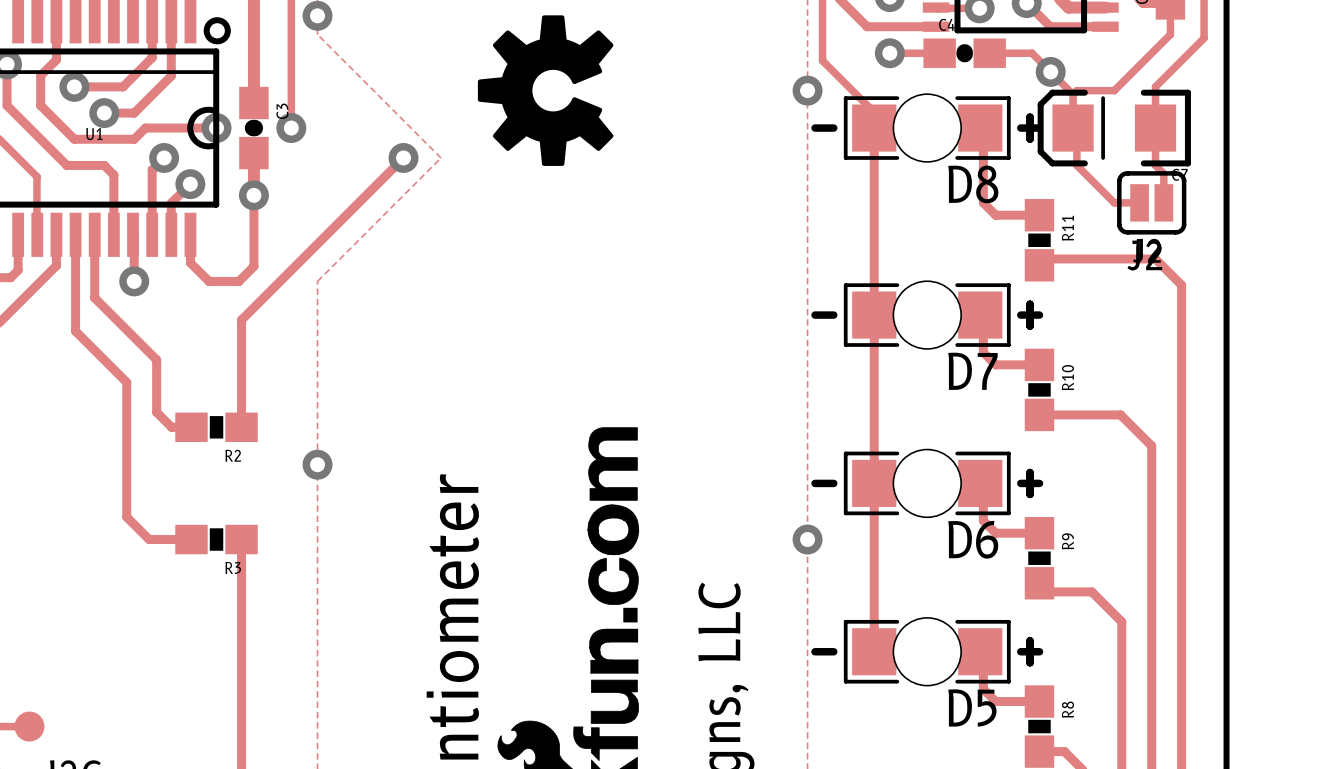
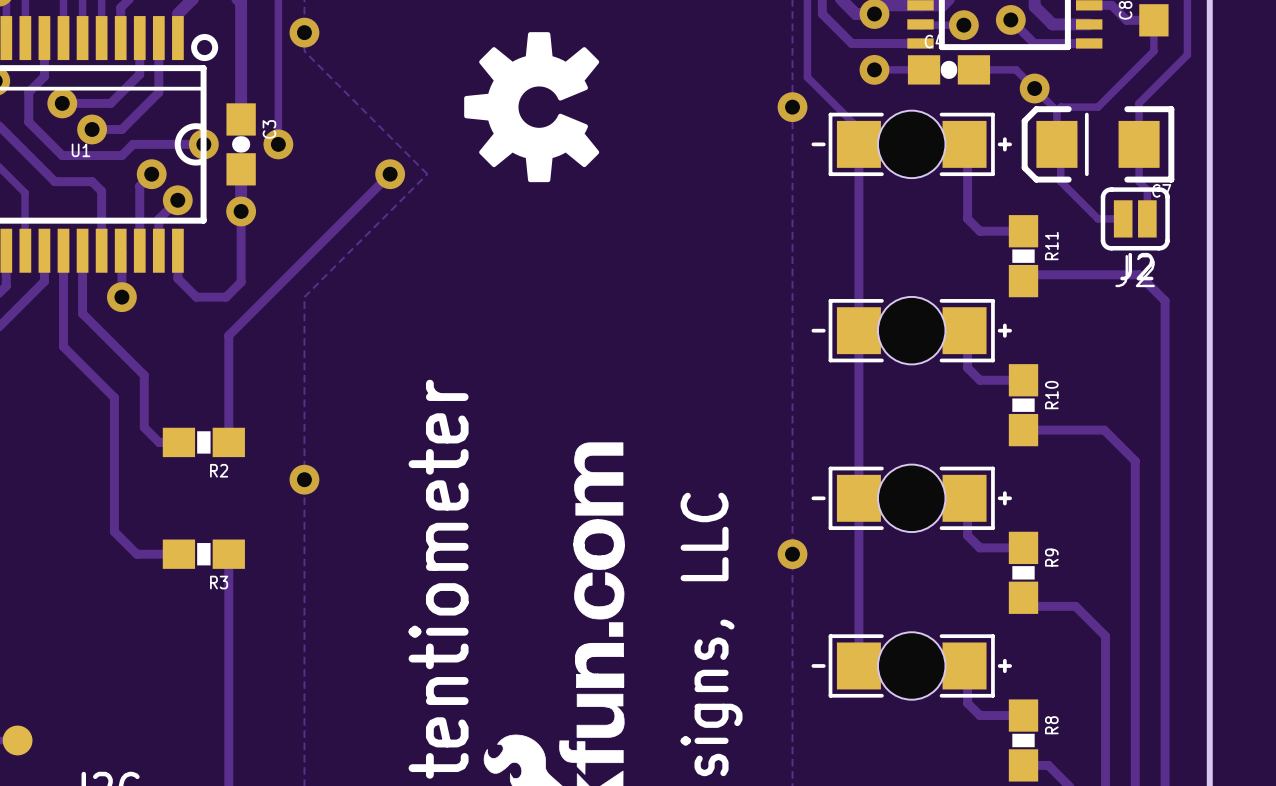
D8: (927, 128) -> none
part: none -> (911, 144)
D7: (927, 315) -> none
part: none -> (911, 330)
D6: (927, 483) -> none
part: none -> (911, 498)
D5: (927, 651) -> none
part: none -> (911, 665)

